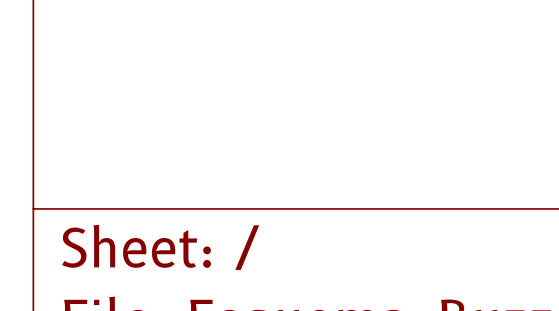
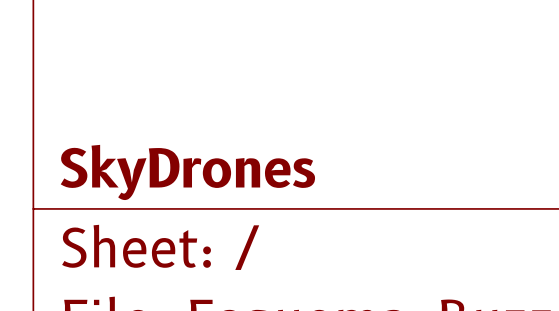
title block: none -> SkyDrones (187, 172)

